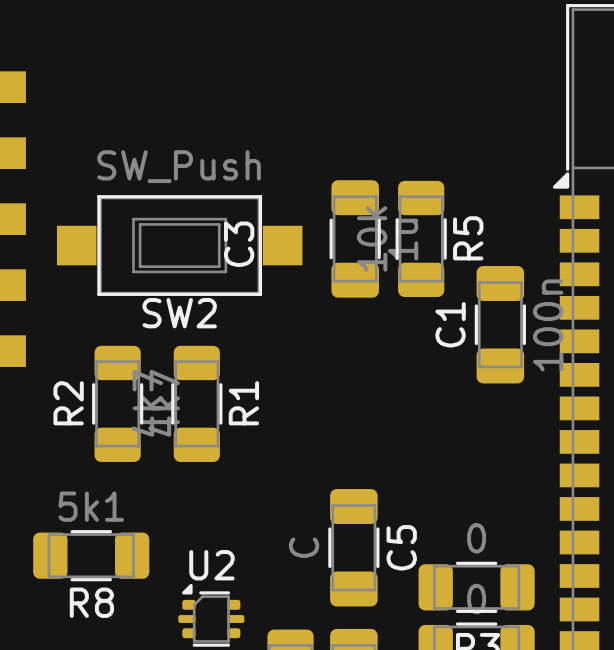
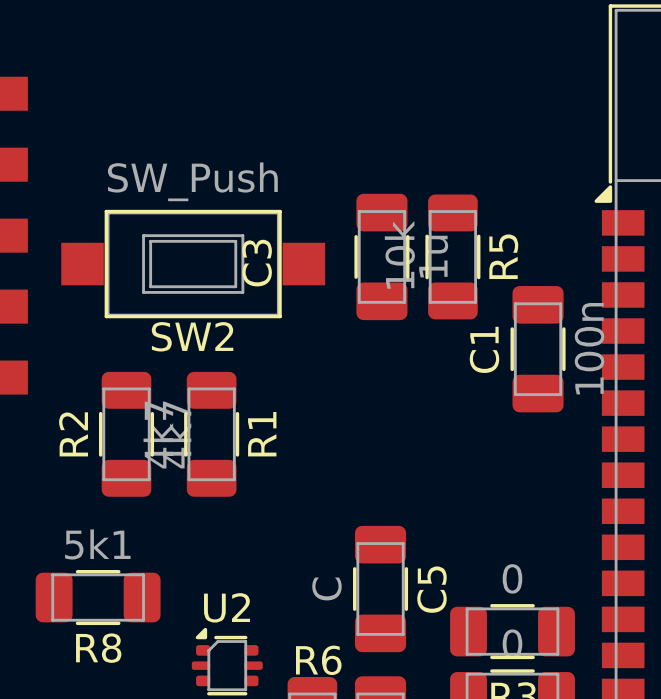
text: none -> R6 (318, 660)

